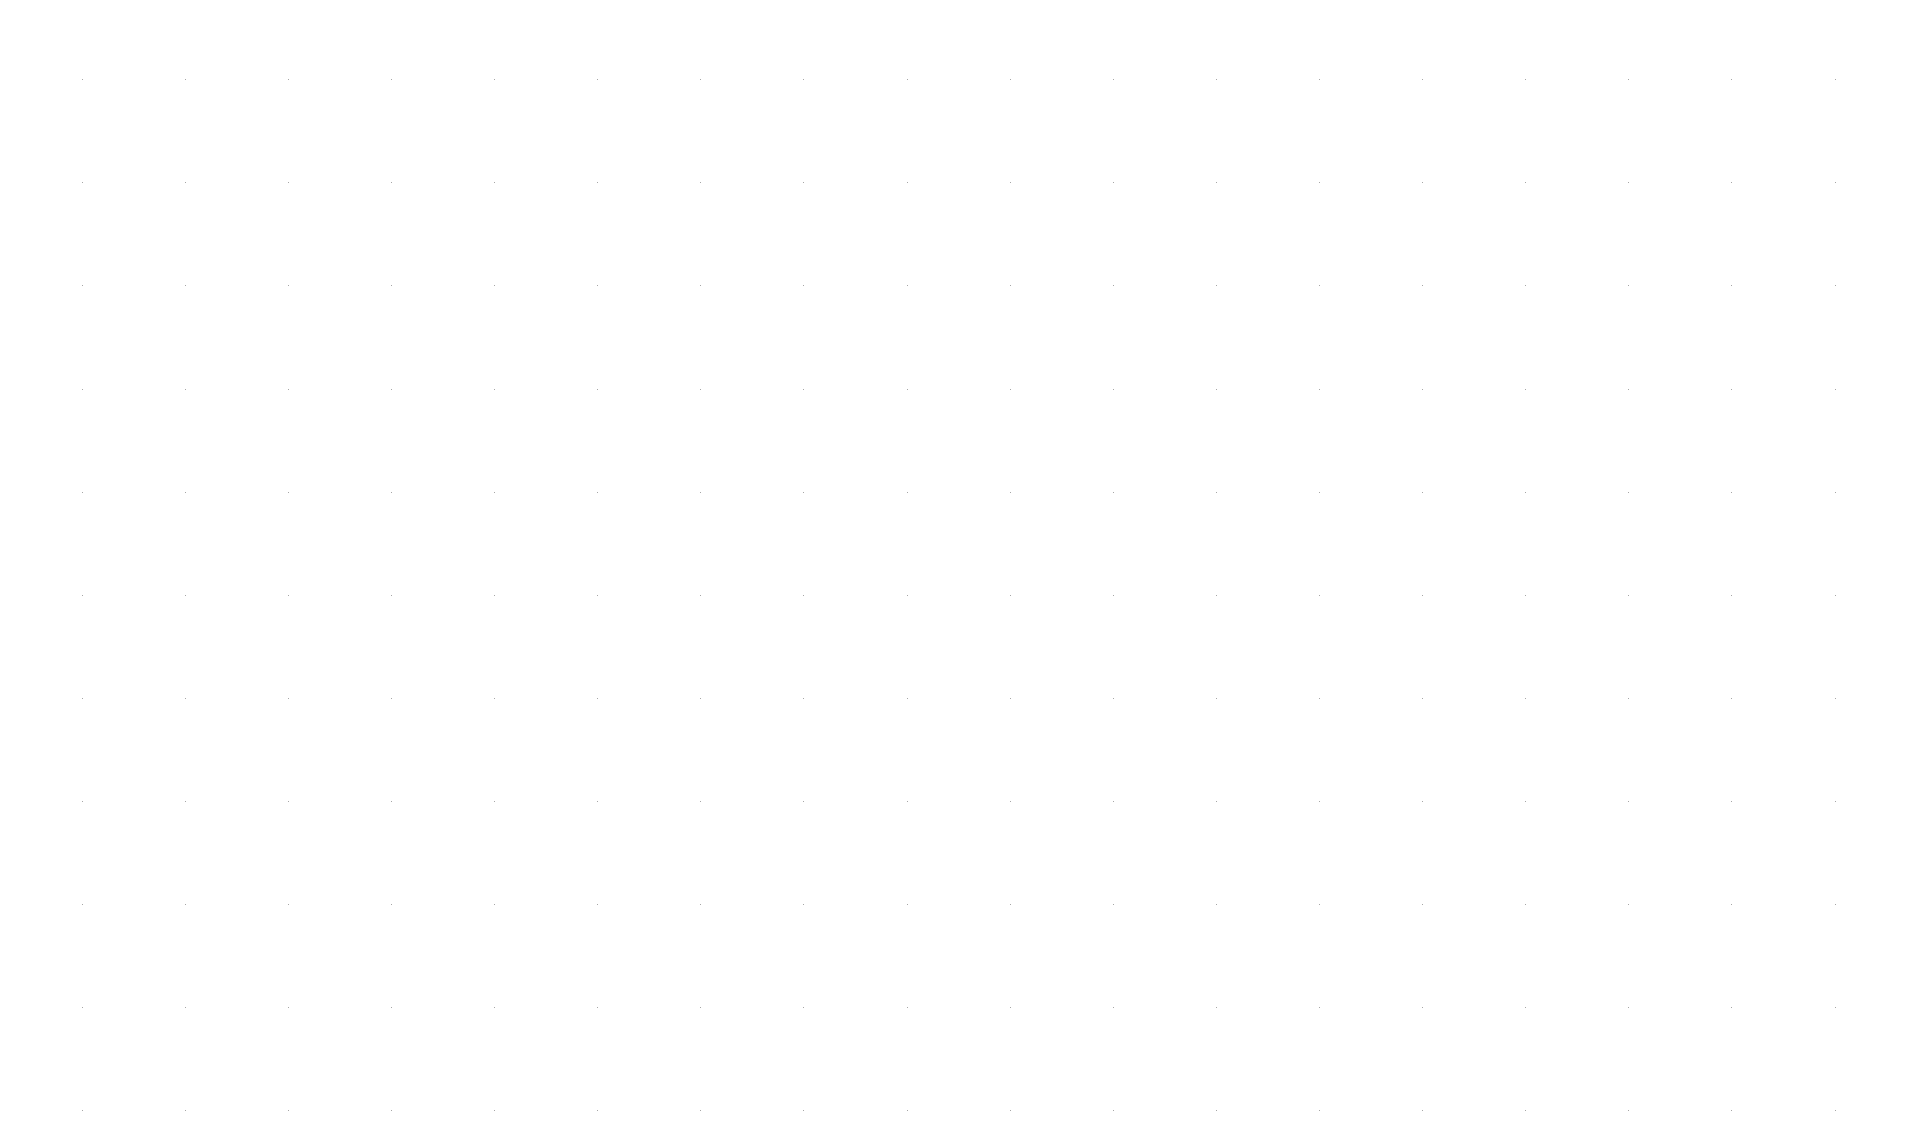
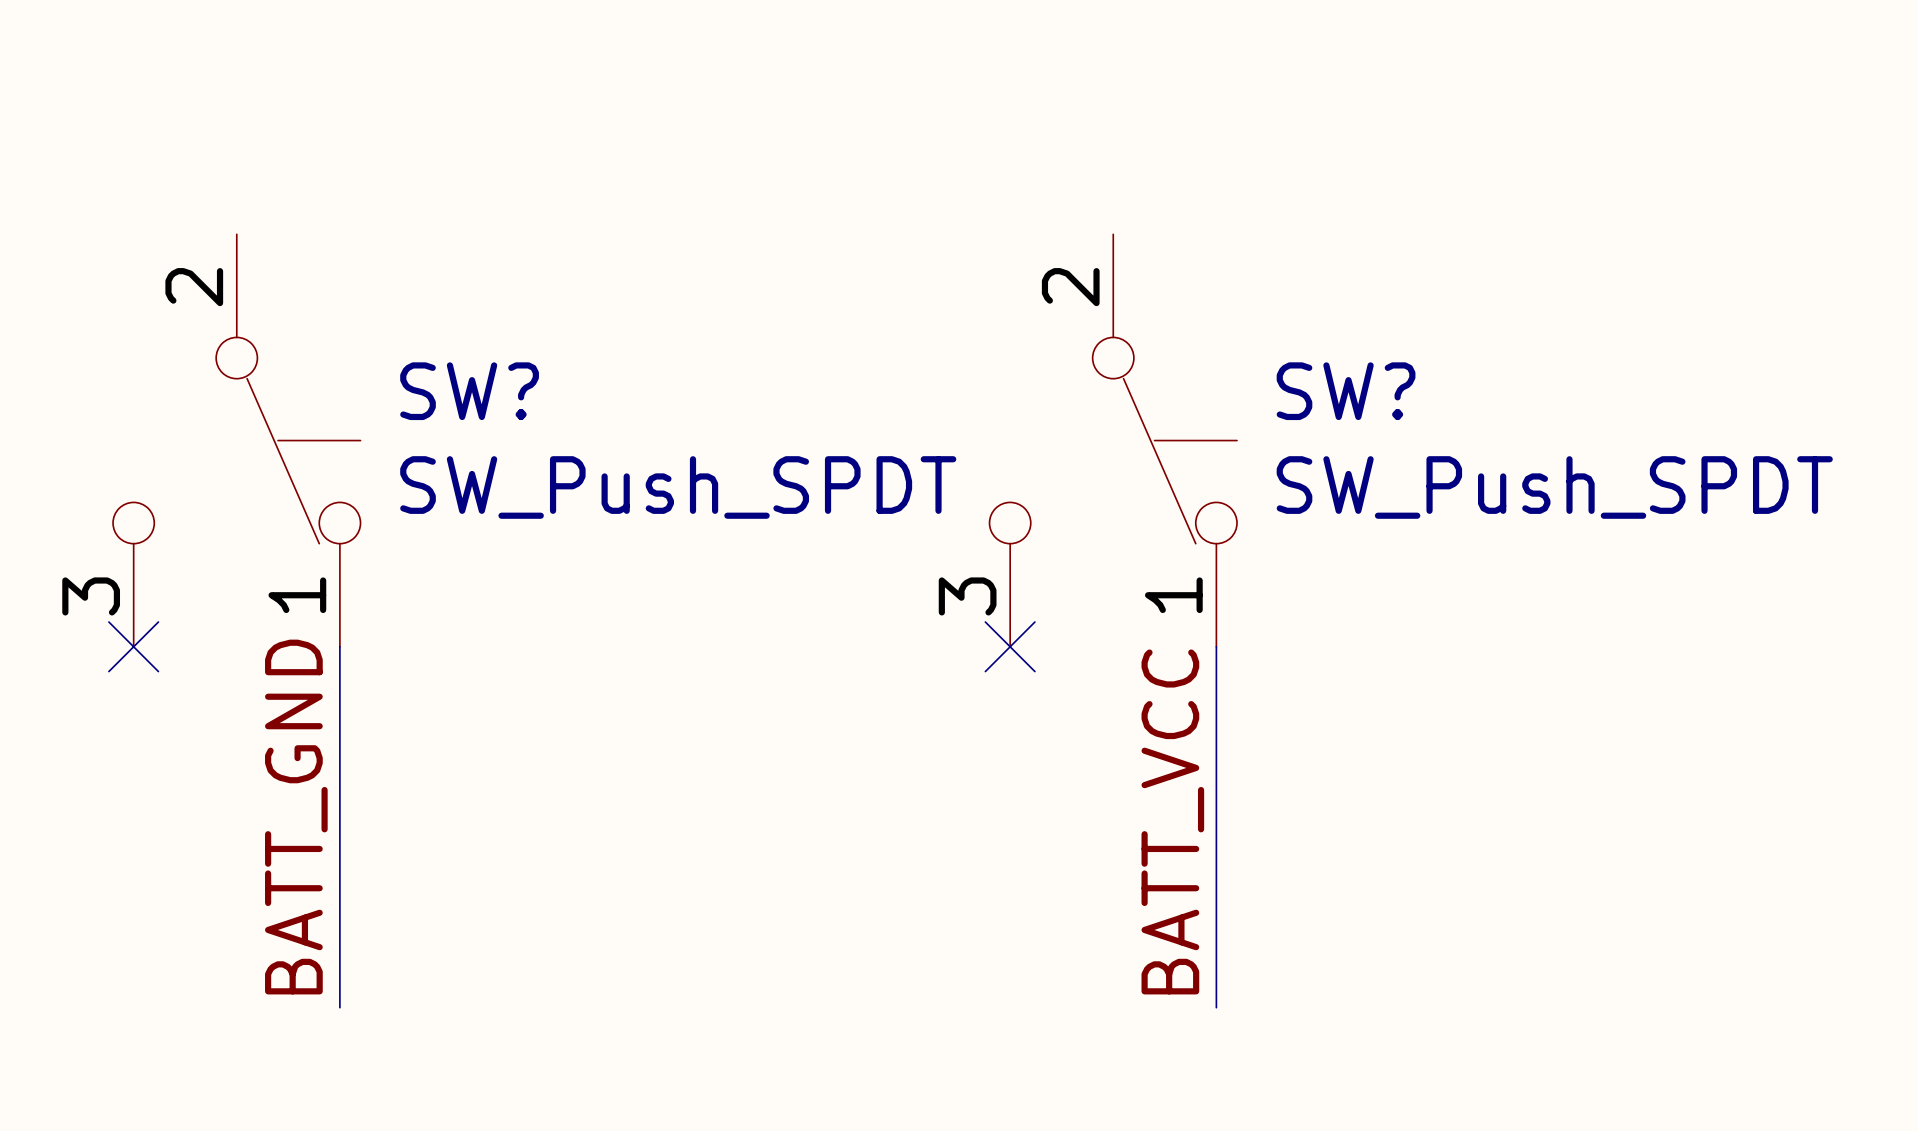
SW?: none -> SW_Push_SPDT (236, 440)
SW?: none -> SW_Push_SPDT (1113, 440)
no-connect mark: none -> (133, 646)
wire: none -> (339, 646) (339, 1007)
no-connect mark: none -> (1010, 646)
wire: none -> (1216, 646) (1216, 1007)
label: none -> BATT_GND (296, 817)
label: none -> BATT_VCC (1172, 821)

